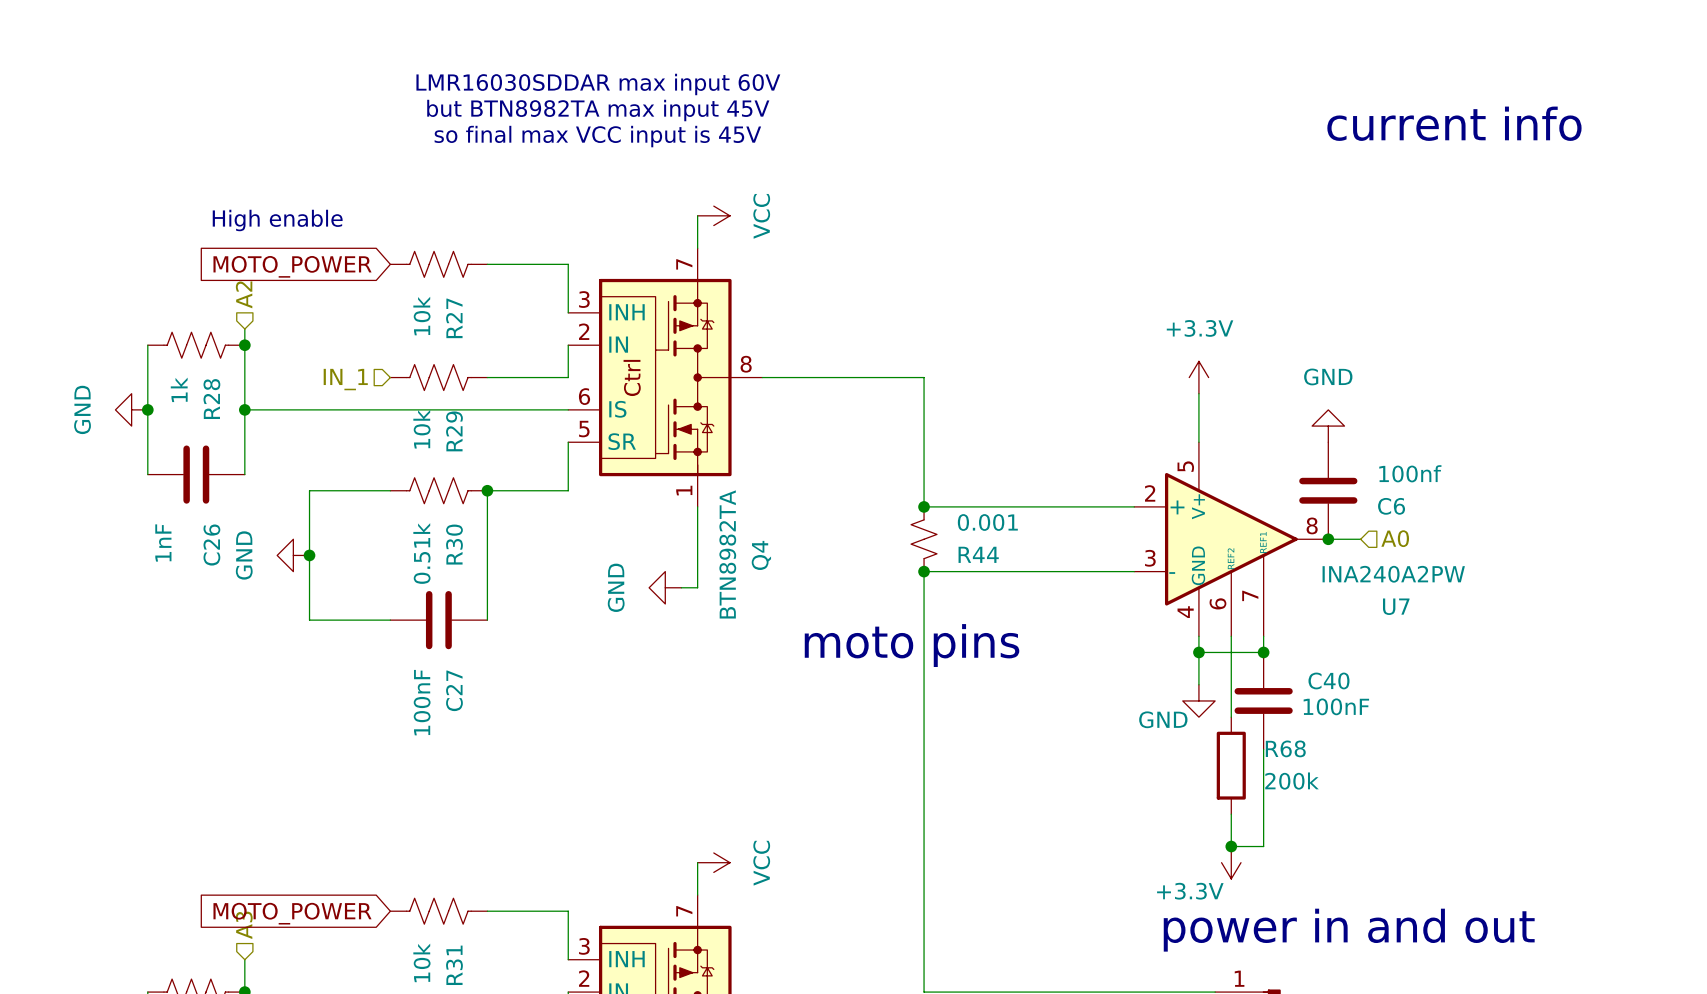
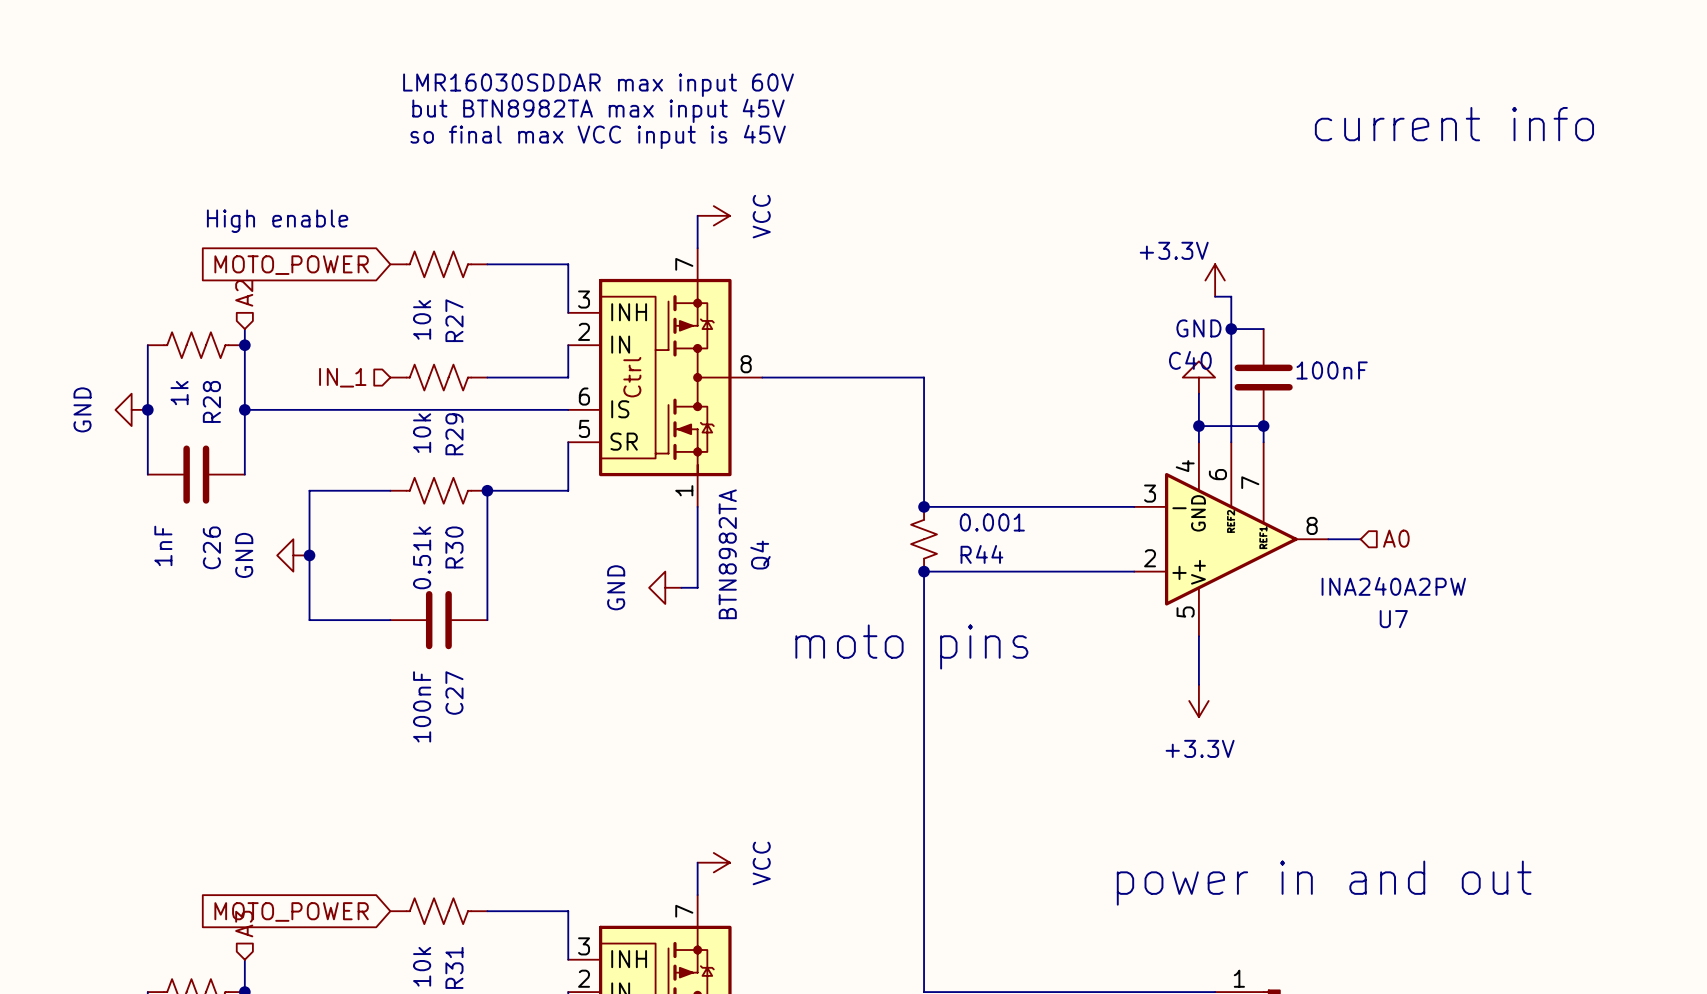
power symbol: none -> +3.3V (1215, 280)
wire: none -> (1215, 296) (1231, 296) (1231, 442)
wire: none -> (1231, 329) (1263, 329)
junction: none -> (1231, 329)
power symbol: +3.3V (1198, 377) -> GND (1198, 377)
wire: none -> (1198, 426) (1263, 426) (1263, 442)
junction: none -> (1198, 426)
junction: none -> (1263, 426)
power symbol: GND (1328, 426) -> none
C6: 100nf (1328, 490) -> none
U7 flip: as is (1231, 539) -> up-down (1231, 539)
junction: (1328, 539) -> none
wire: (1231, 636) (1231, 717) -> none
wire: (1263, 636) (1263, 652) (1198, 652) -> none
junction: (1198, 652) -> none
junction: (1263, 652) -> none
C40 name position: C40 (1328, 680) -> C40 (1190, 360)
power symbol: GND (1198, 700) -> +3.3V (1198, 700)
C40 position: (1263, 700) -> (1263, 377)
C40 value position: 100nF (1336, 706) -> 100nF (1332, 370)
wire: (1263, 749) (1263, 846) (1231, 846) (1231, 814) -> none
R68: 200k (1231, 765) -> none
junction: (1231, 846) -> none
power symbol: +3.3V (1231, 862) -> none
text position: power in and out (1349, 930) -> power in and out (1324, 883)

